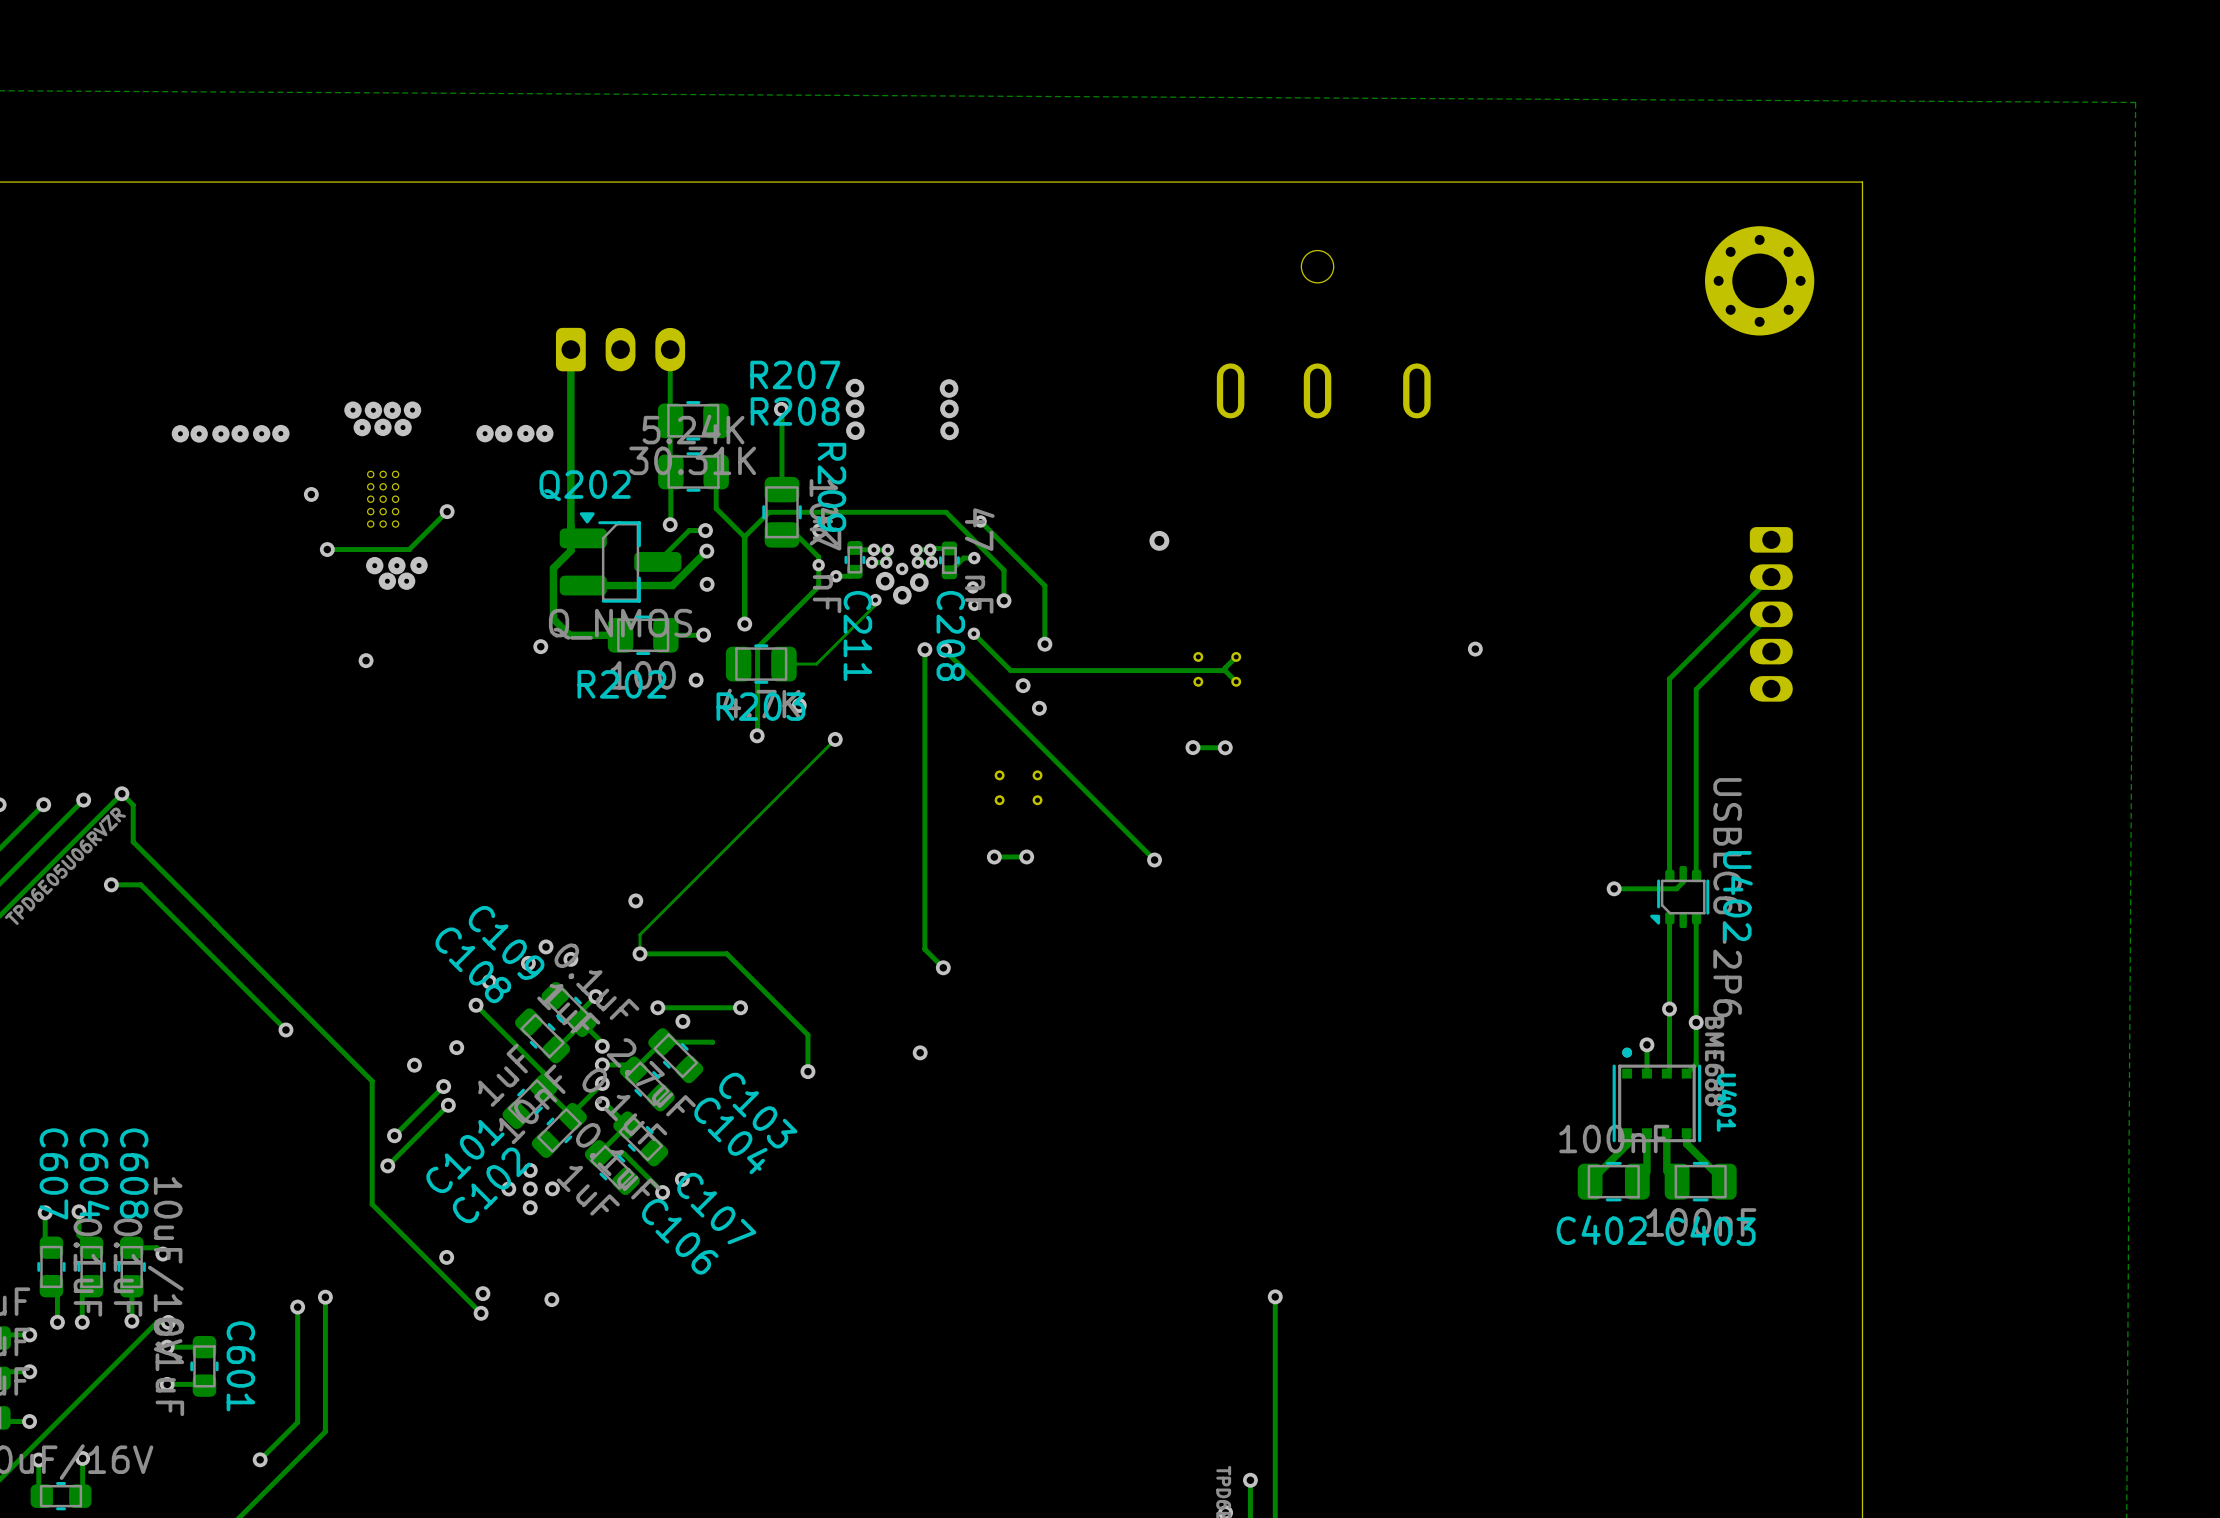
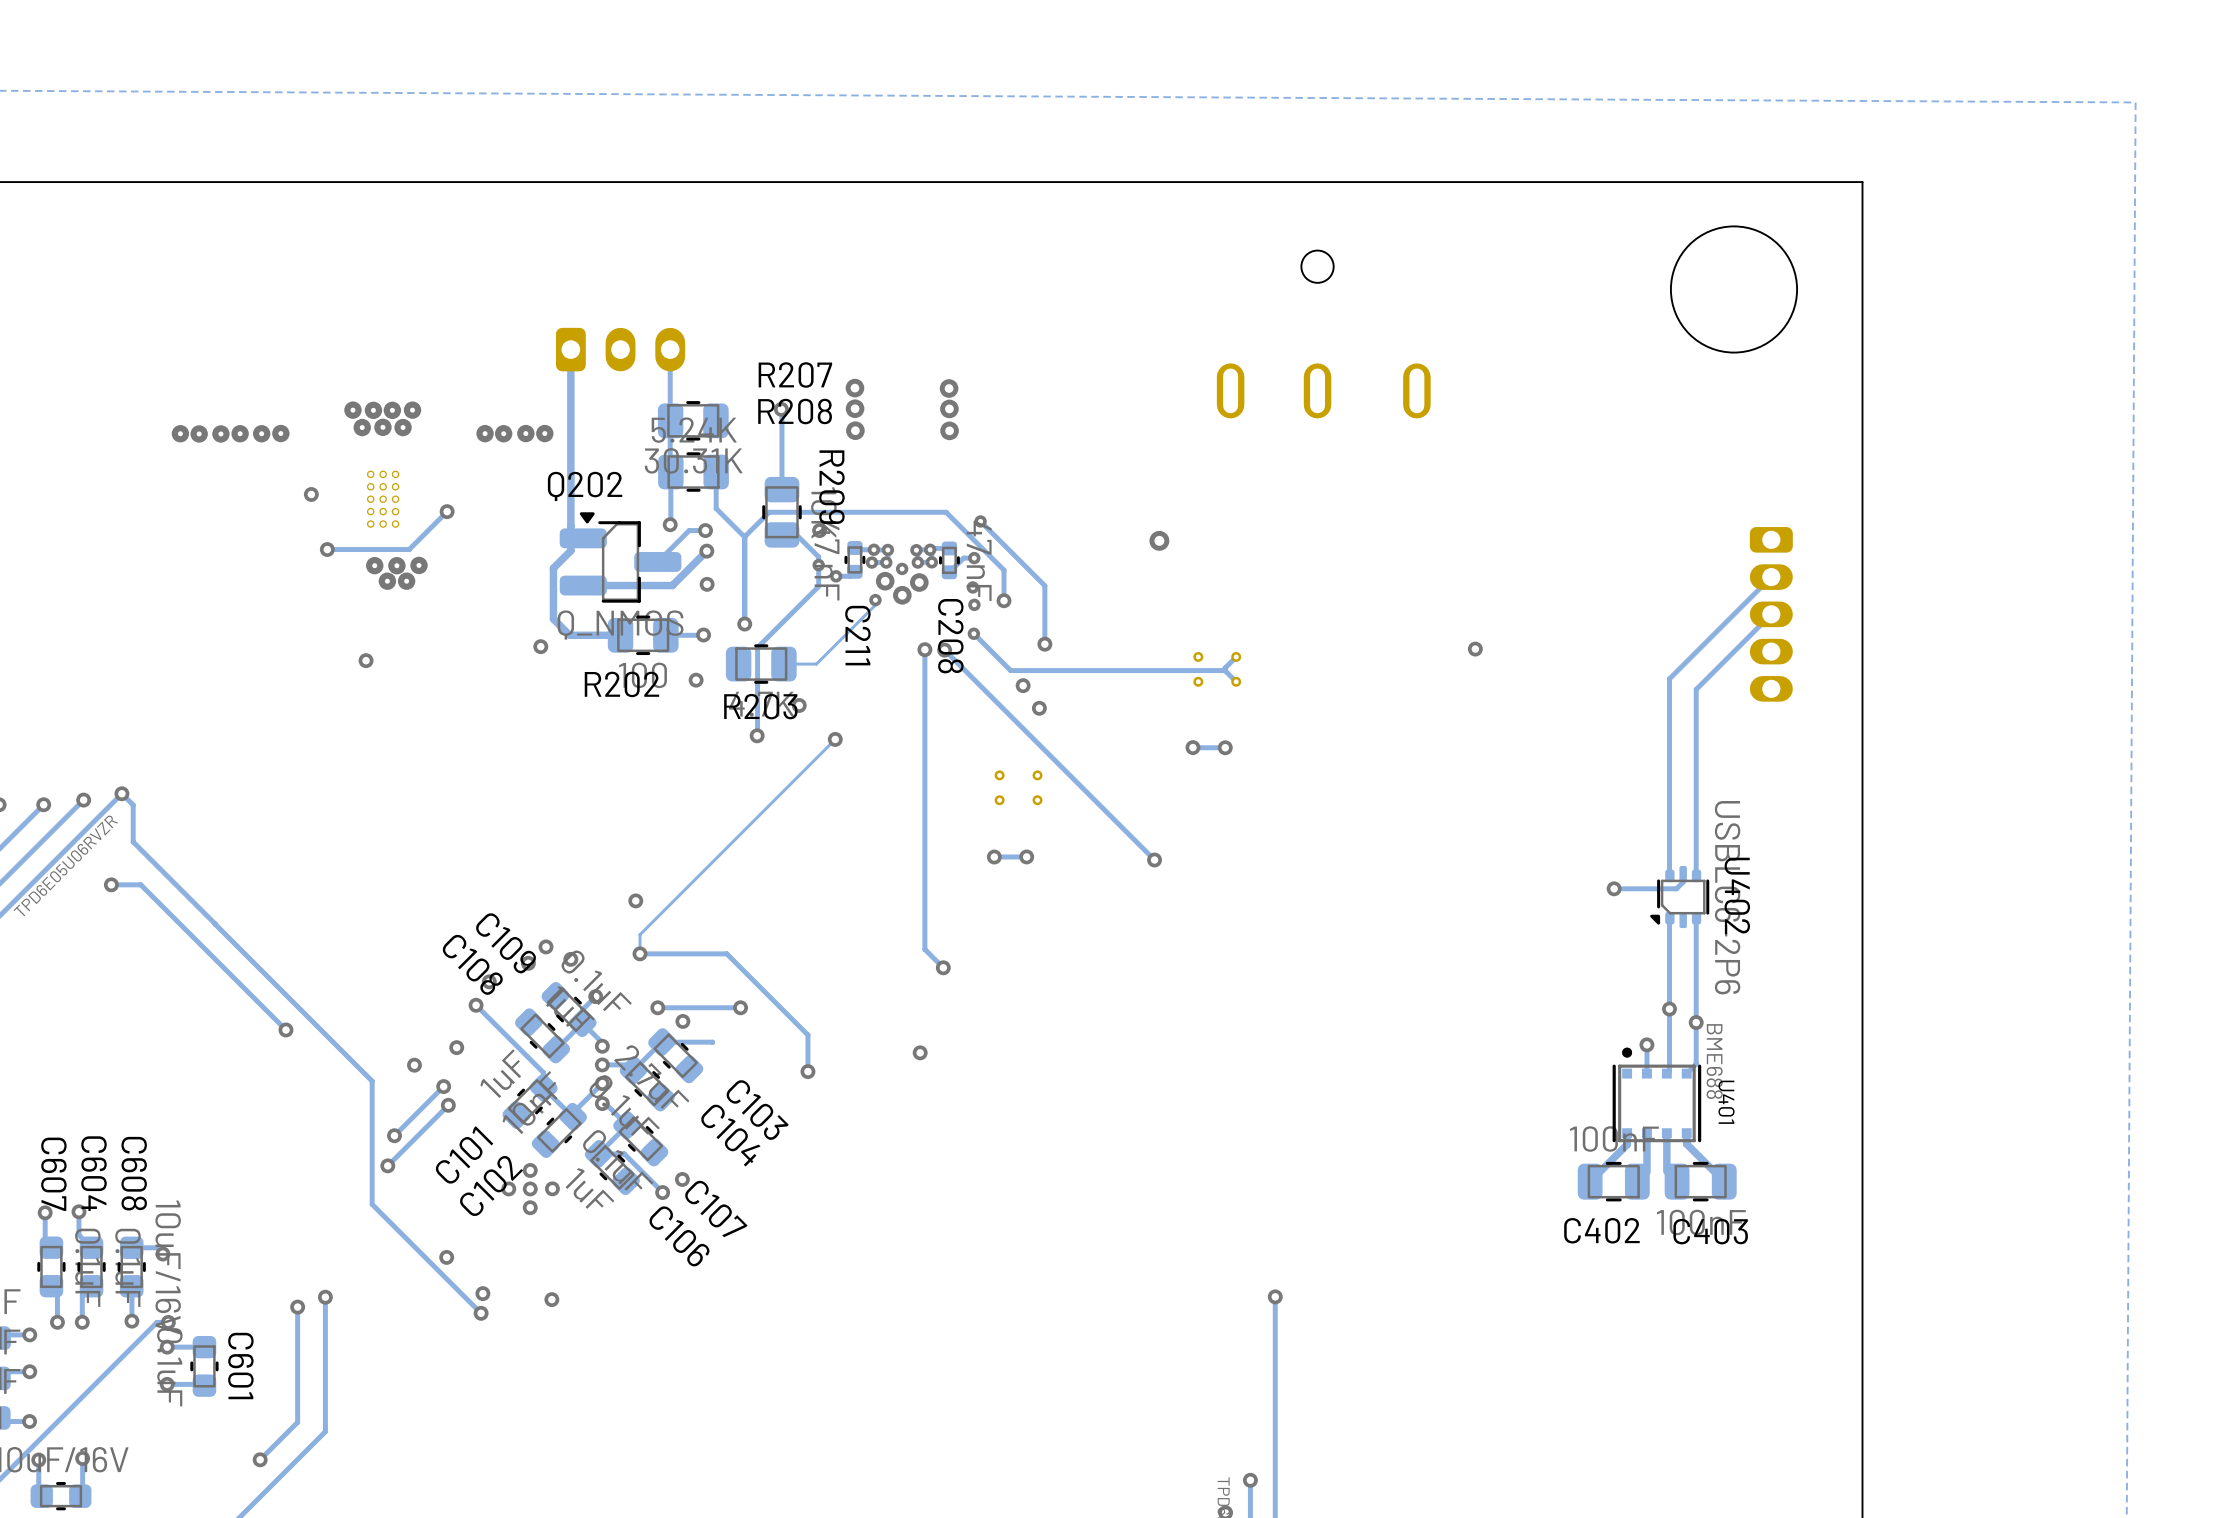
round board edge: none -> [1670, 225, 1798, 354]
part: (1759, 280) -> none

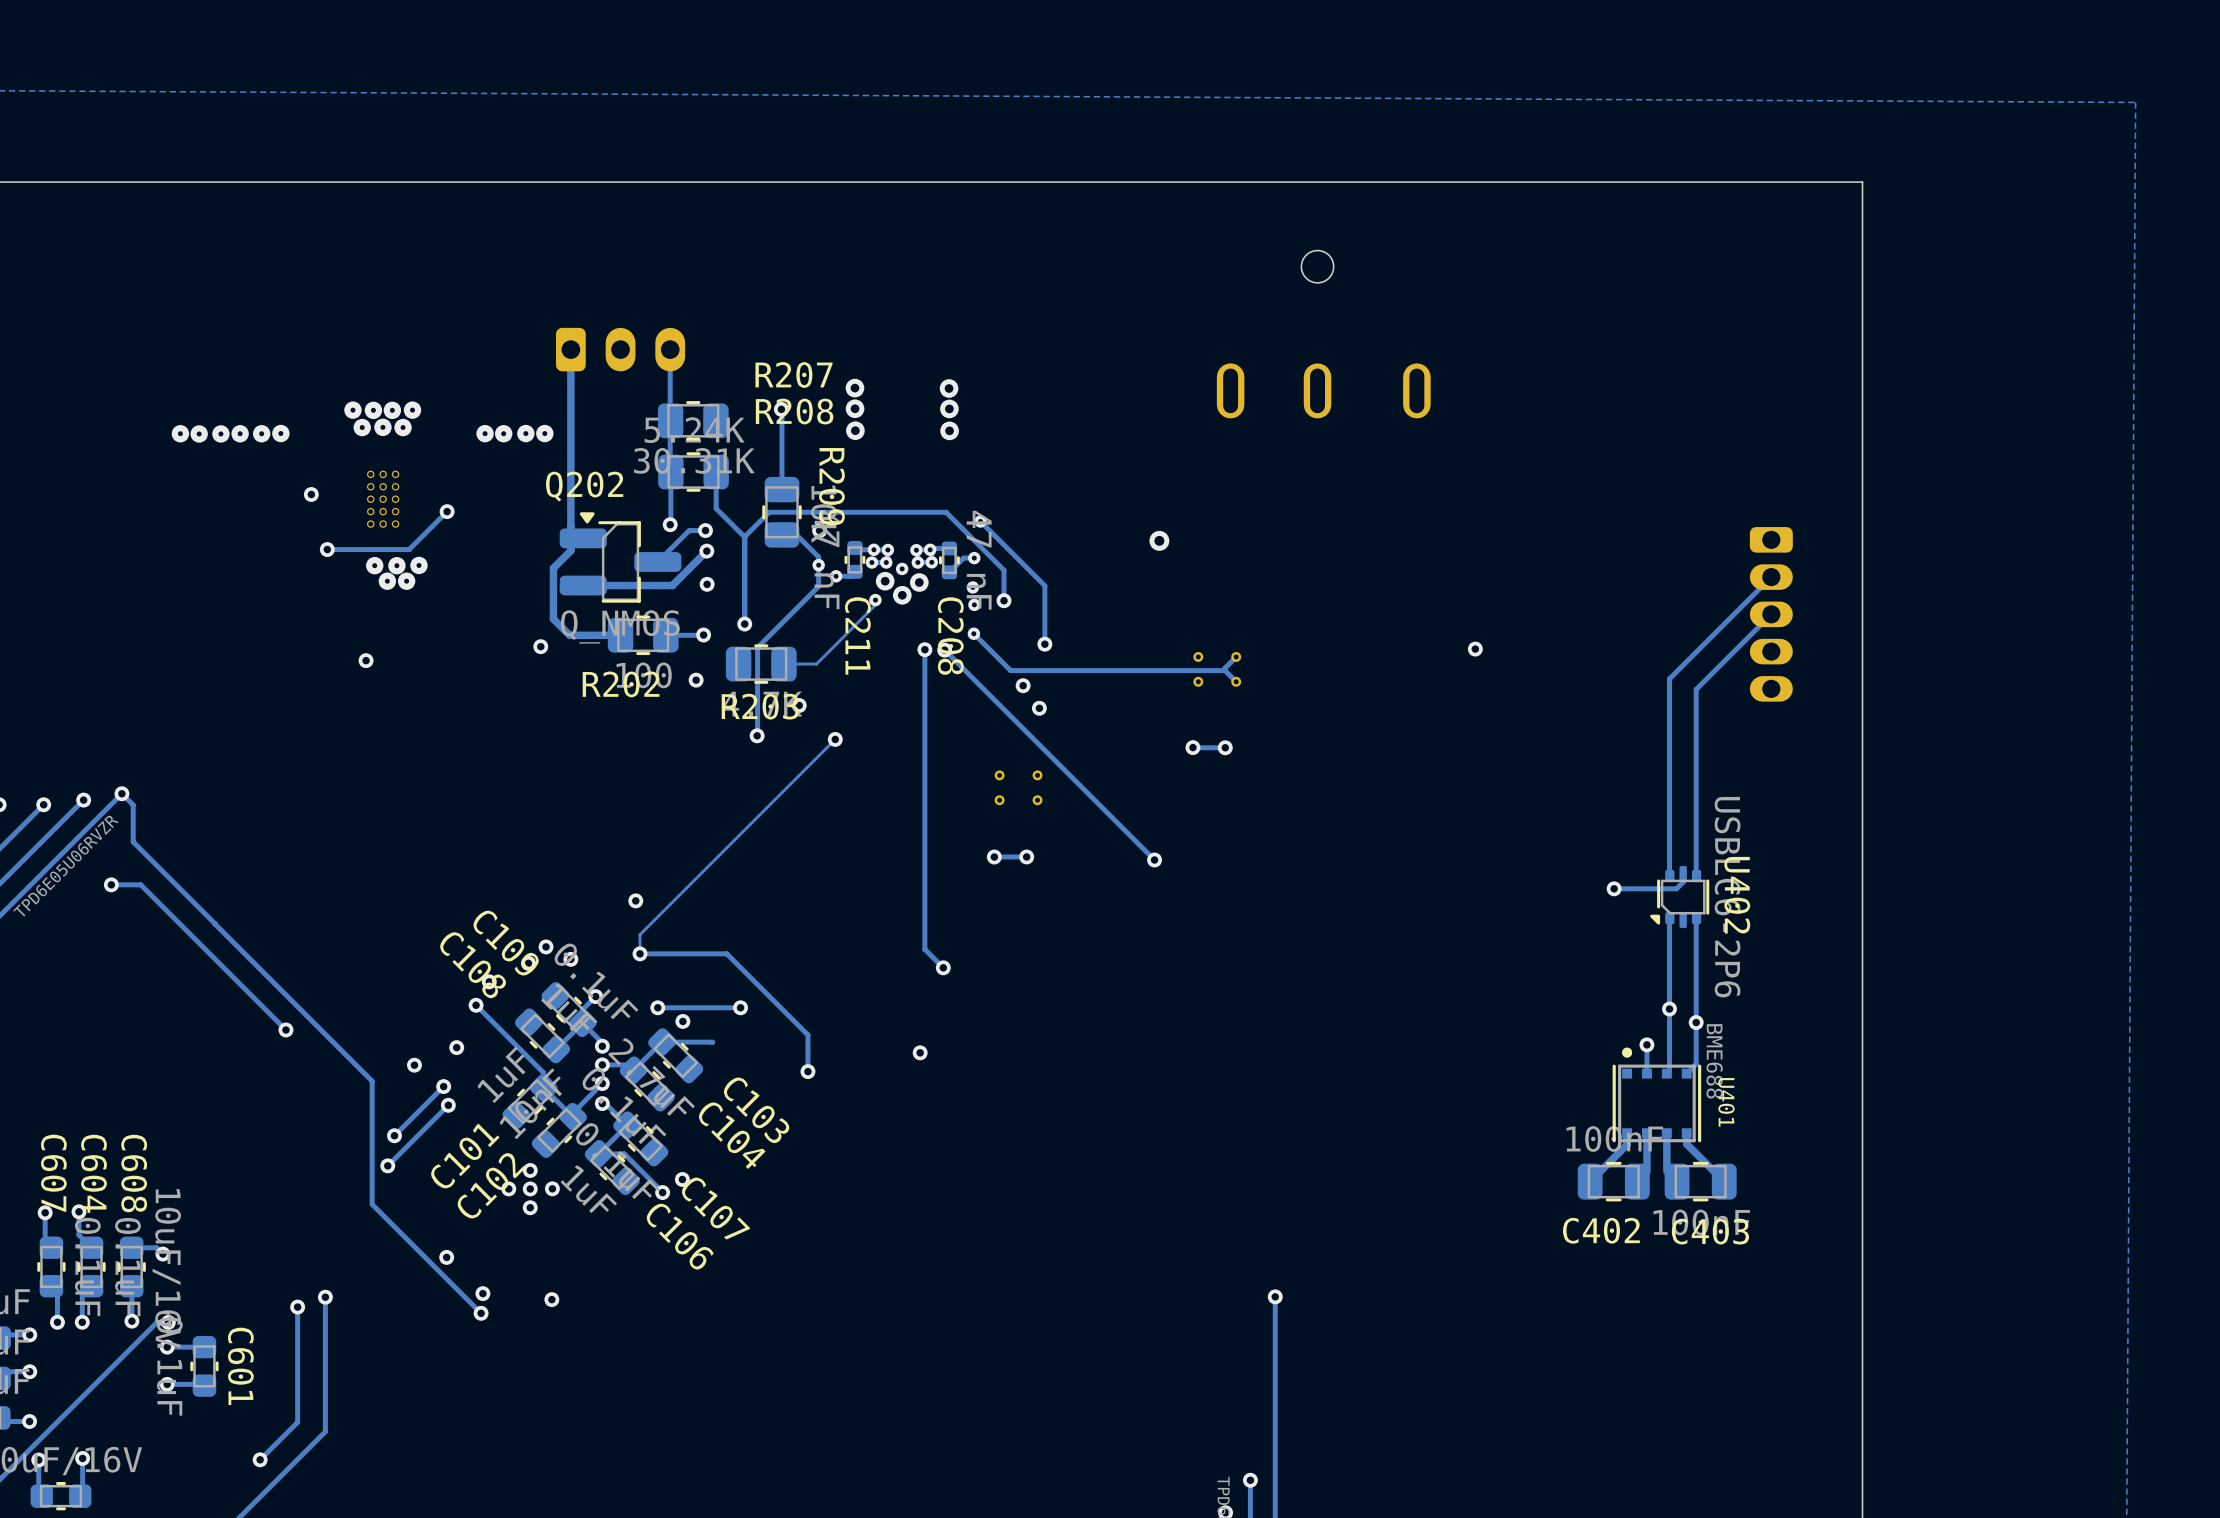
round board edge: [1670, 225, 1798, 354] -> none

